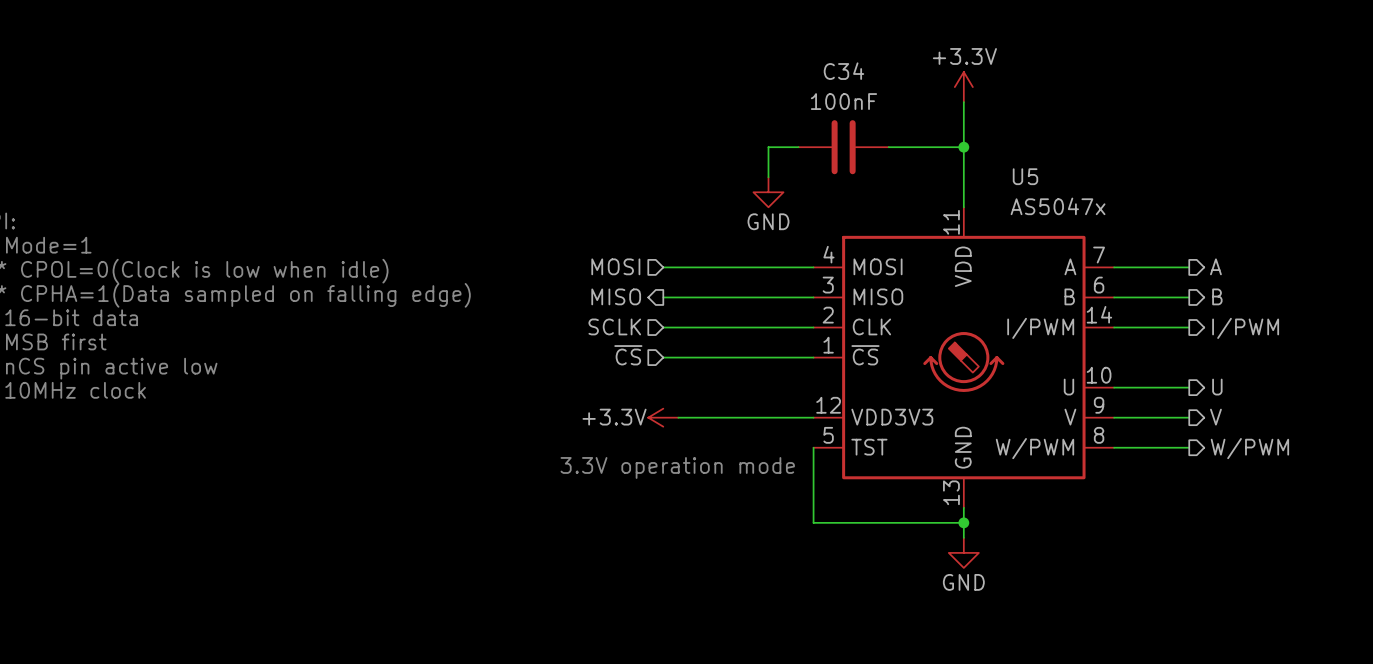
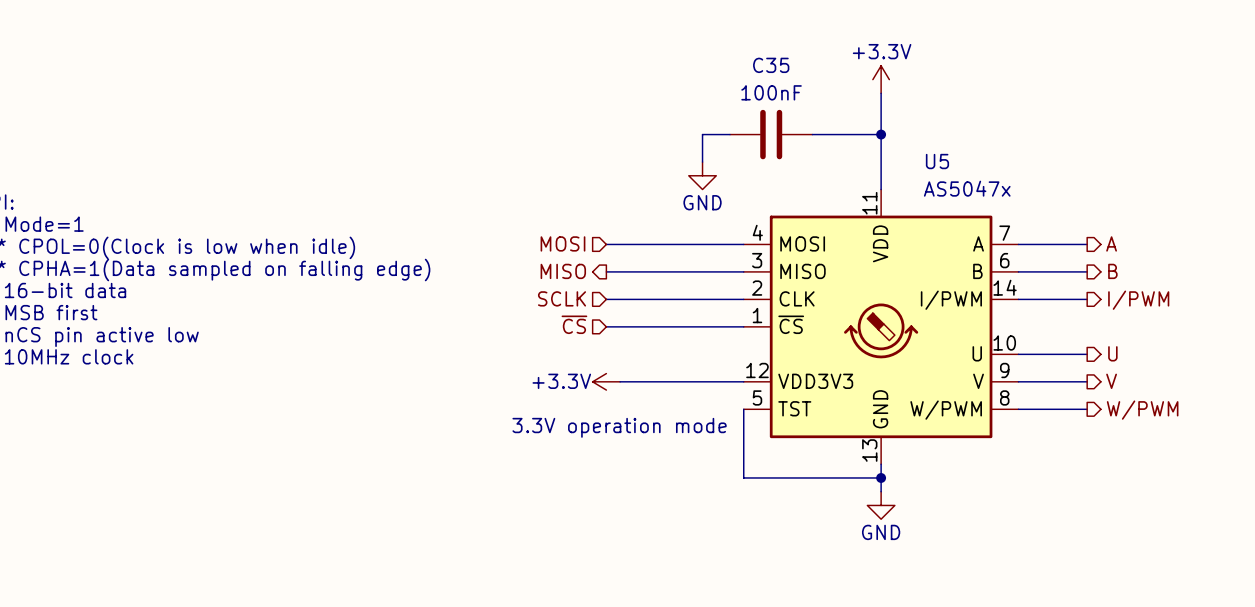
C34 name: C34 (843, 71) -> C35 (771, 65)

